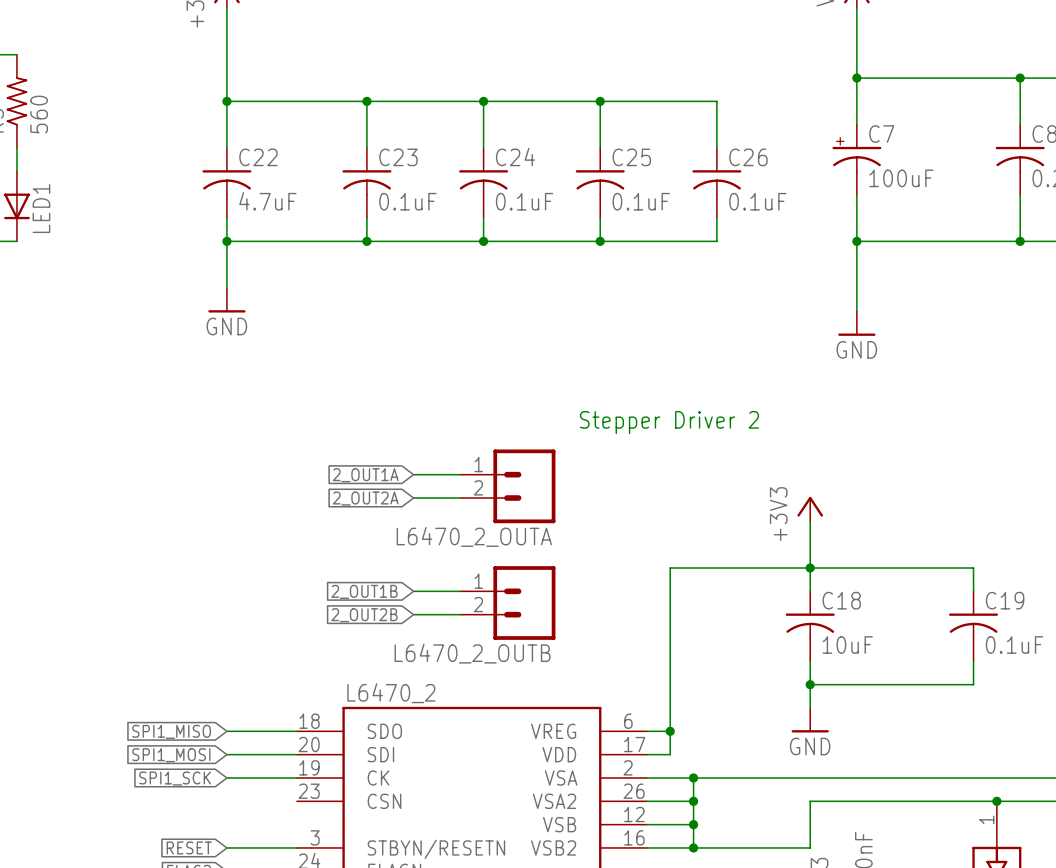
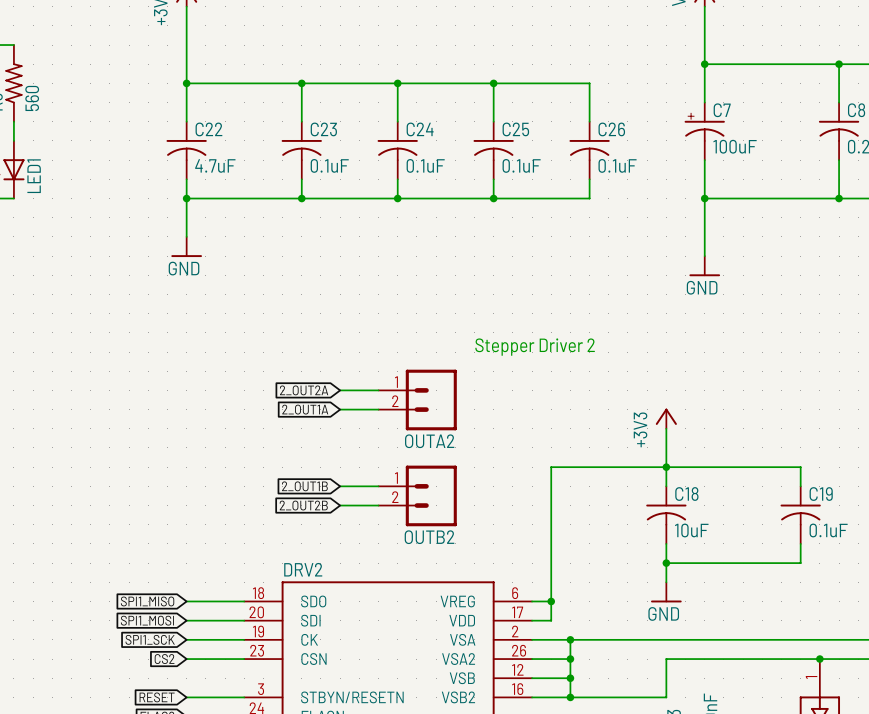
global label: 2_OUT1A (365, 475) -> 2_OUT2A (304, 390)
global label: 2_OUT2A (365, 498) -> 2_OUT1A (305, 409)
L6470_2_OUTA name: L6470_2_OUTA (474, 536) -> OUTA2 (429, 441)
L6470_2_OUTB name: L6470_2_OUTB (472, 653) -> OUTB2 (429, 537)
L6470_2 name: L6470_2 (391, 693) -> DRV2 (303, 569)
global label: none -> CS2 (164, 659)
wire: none -> (186, 659) (244, 659)

